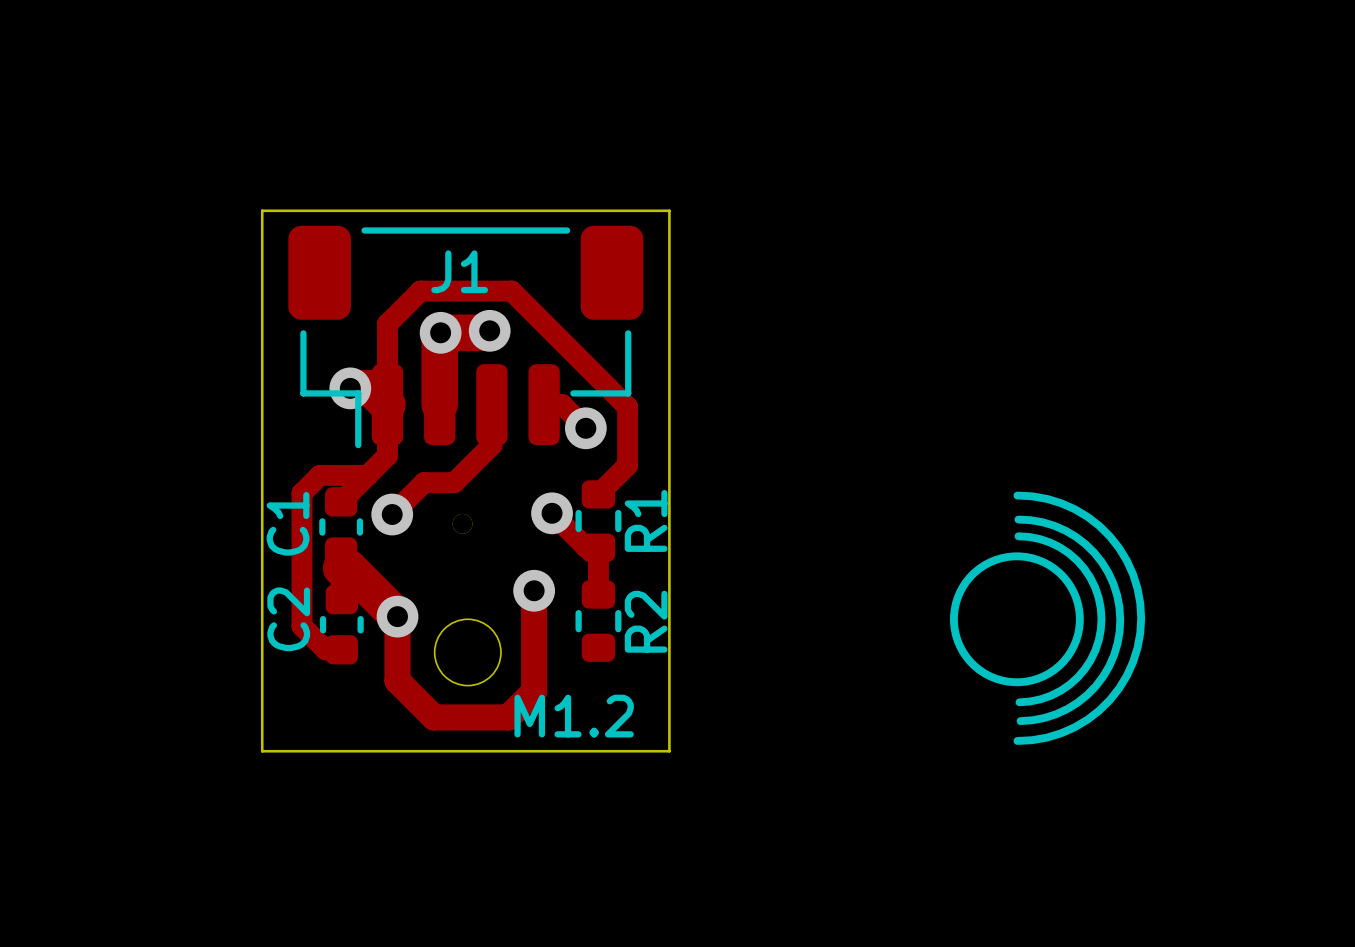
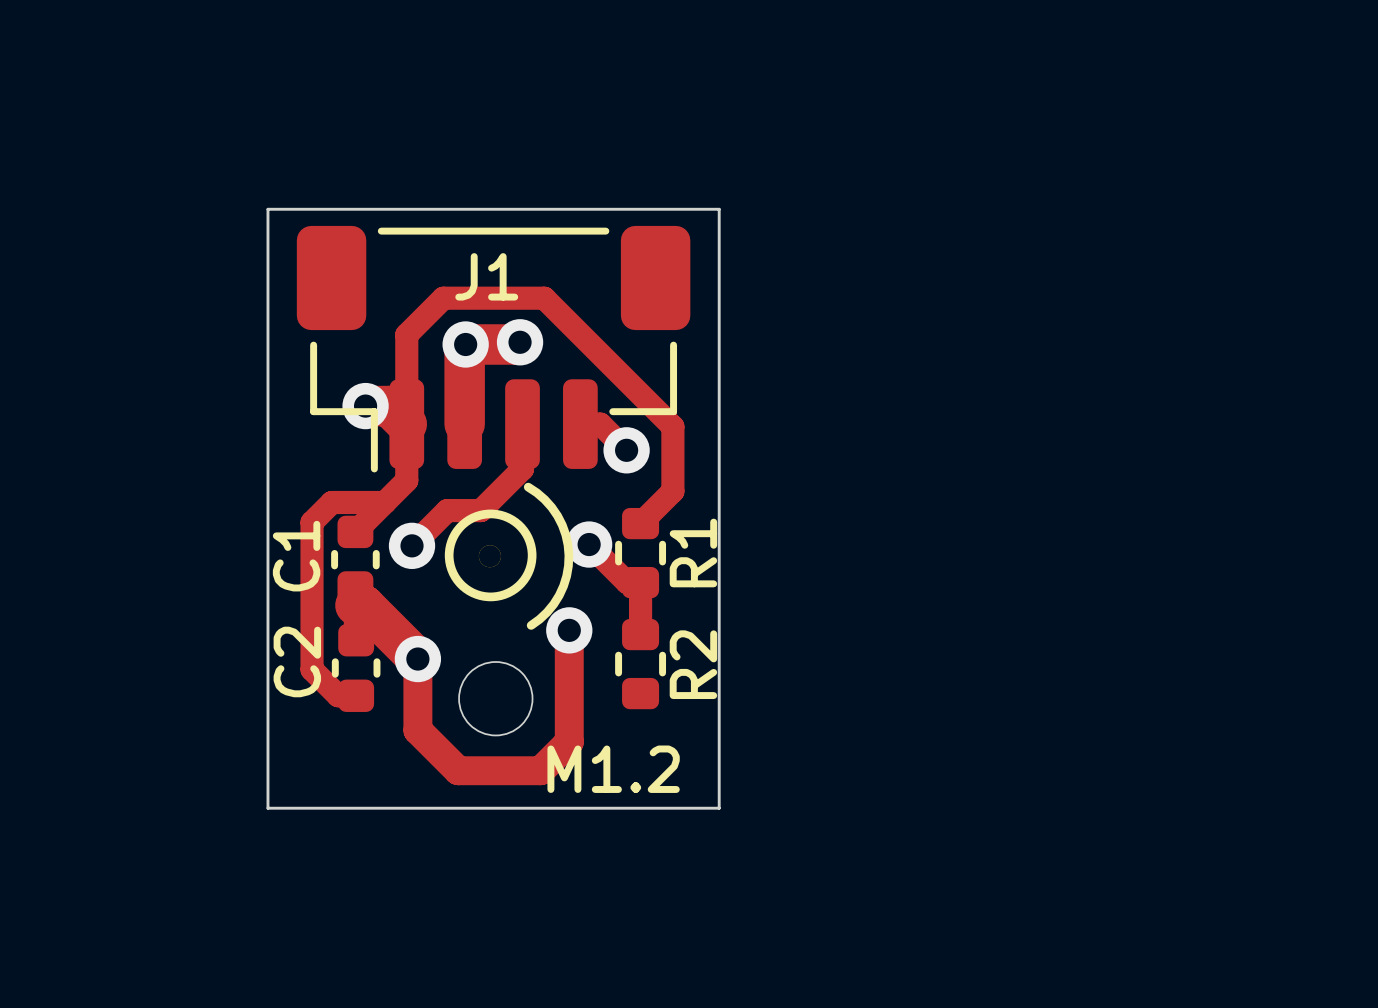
drawing: none -> [444, 482, 574, 630]
drawing: [950, 491, 1146, 745] -> none

